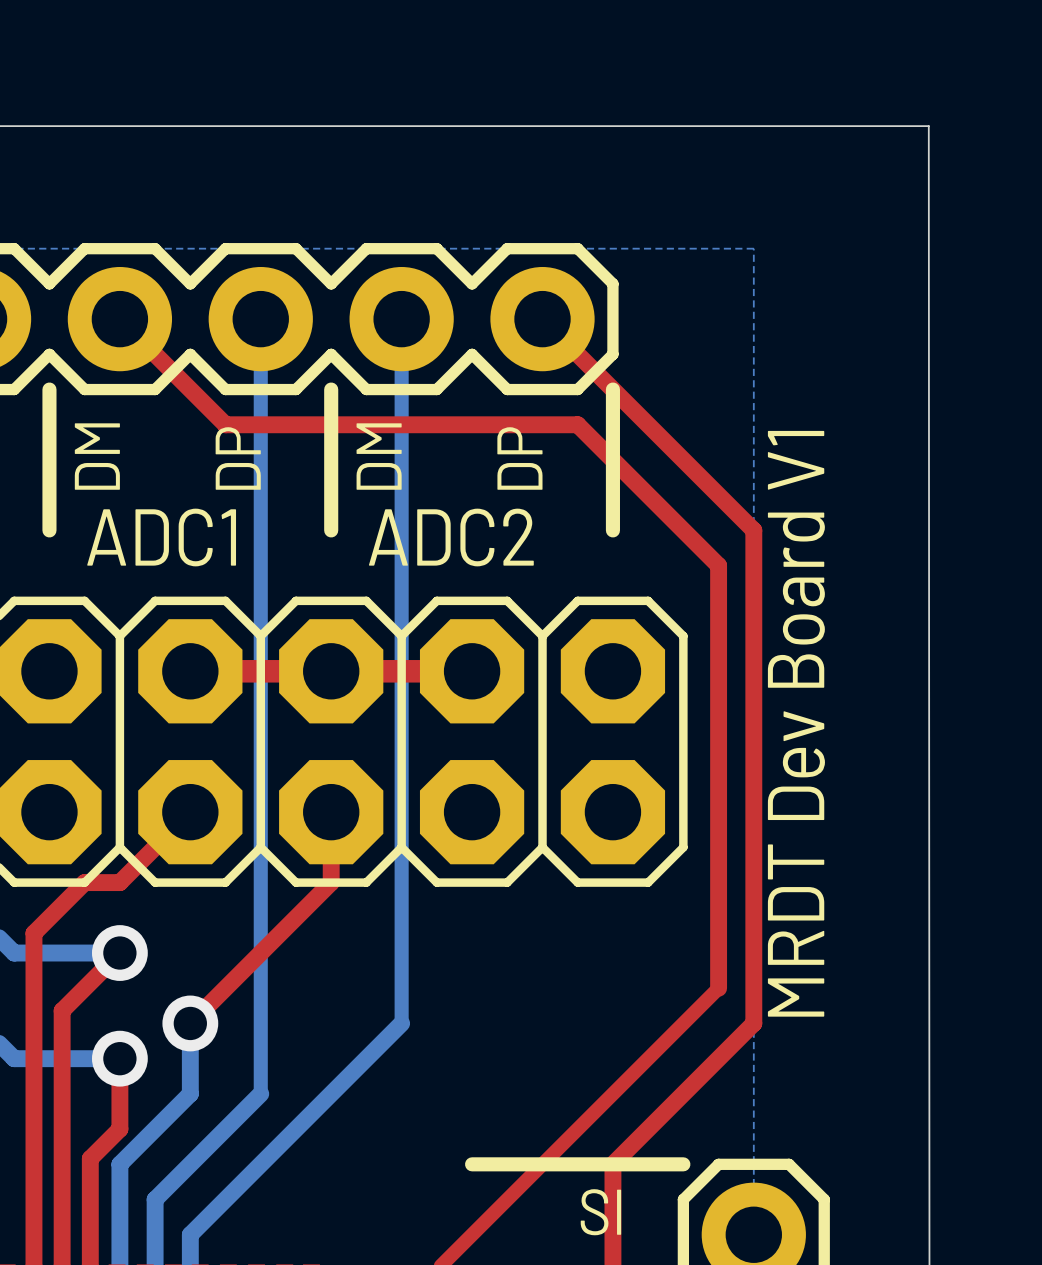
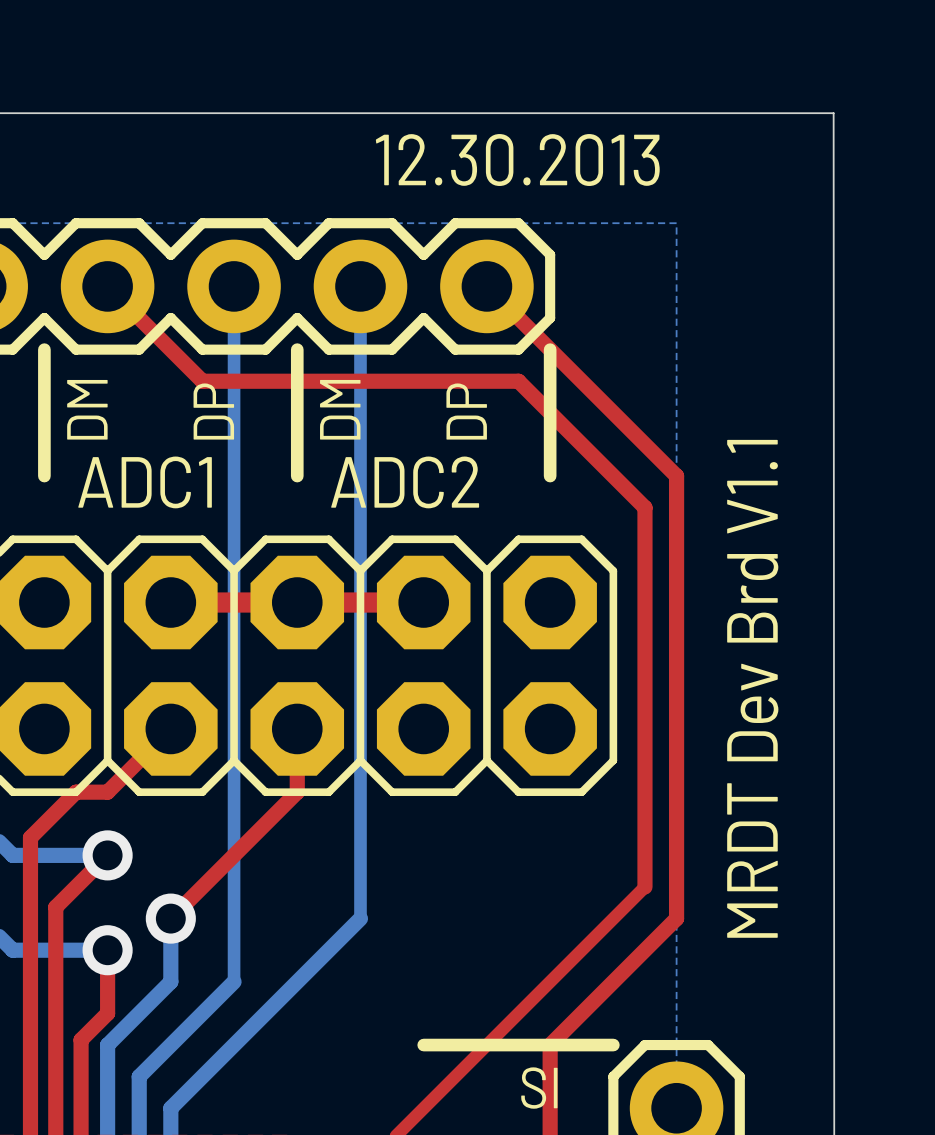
text: none -> 12.30.2013 (517, 160)
text: MRDT Dev Board V1 (796, 723) -> MRDT Dev Brd V1.1 (752, 688)

